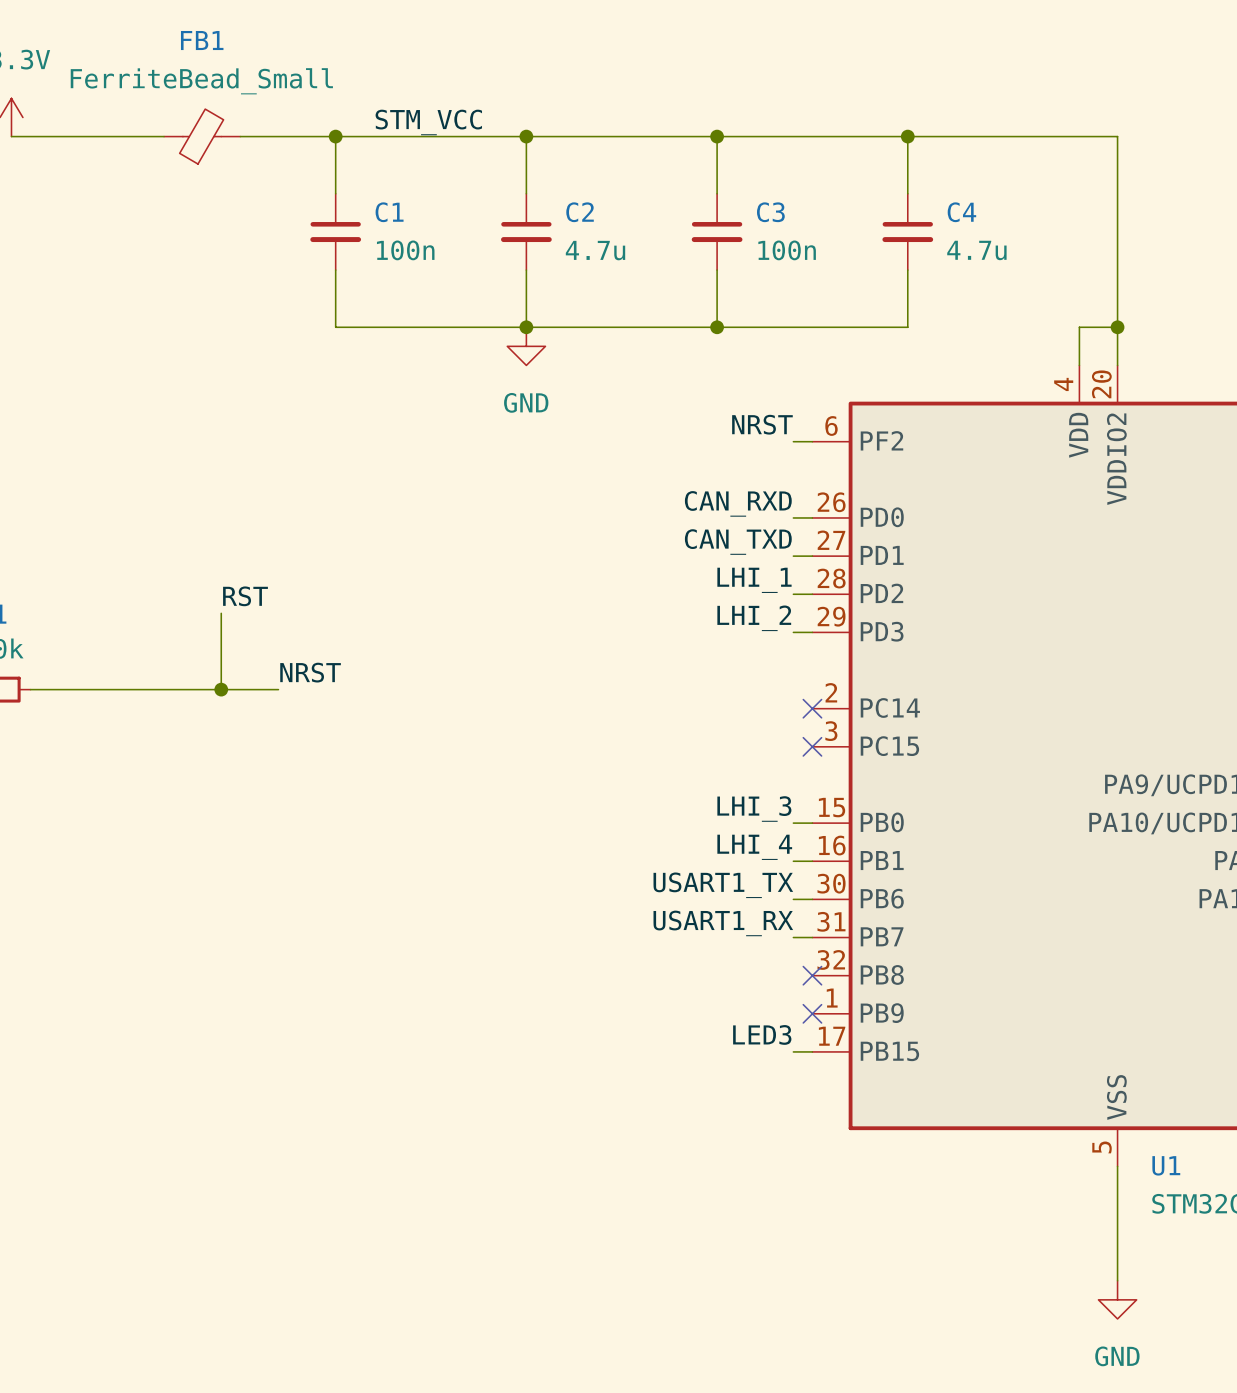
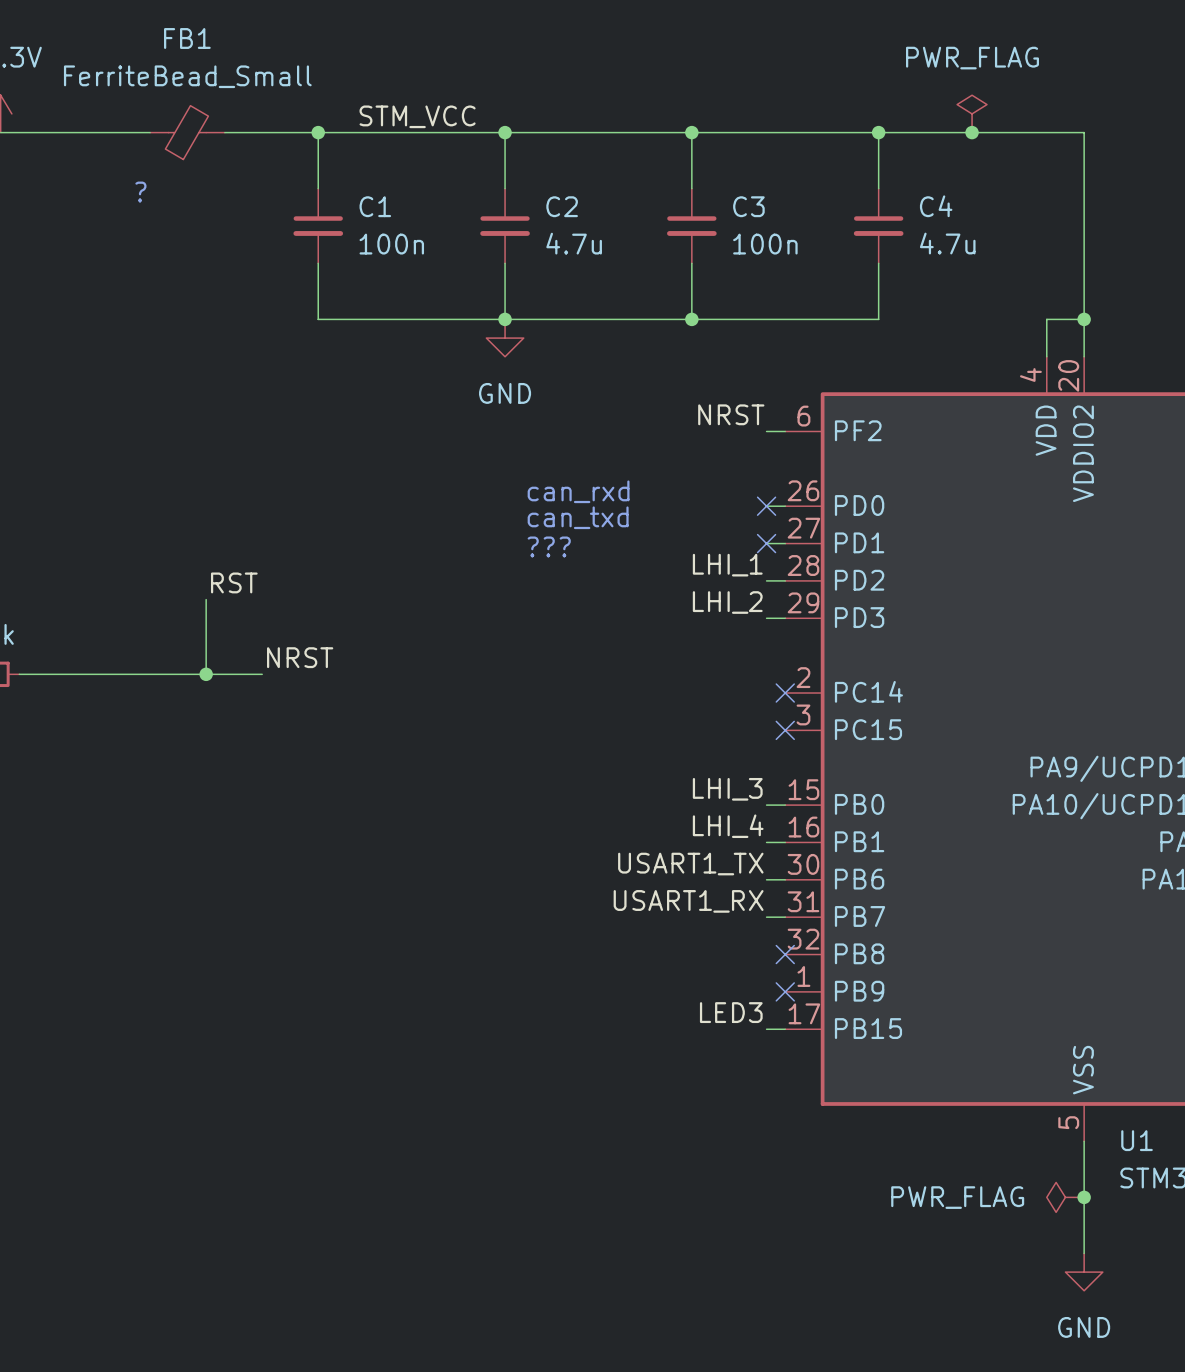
power symbol: none -> PWR_FLAG (972, 113)
junction: none -> (972, 132)
text: none -> ? (140, 192)
label: CAN_RXD (738, 503) -> none
text: none -> can_rxd (578, 491)
no-connect mark: none -> (766, 506)
text: none -> can_txd (578, 517)
label: CAN_TXD (738, 542) -> none
no-connect mark: none -> (766, 543)
text: none -> ??? (549, 546)
power symbol: none -> PWR_FLAG (1065, 1197)
junction: none -> (1084, 1197)

